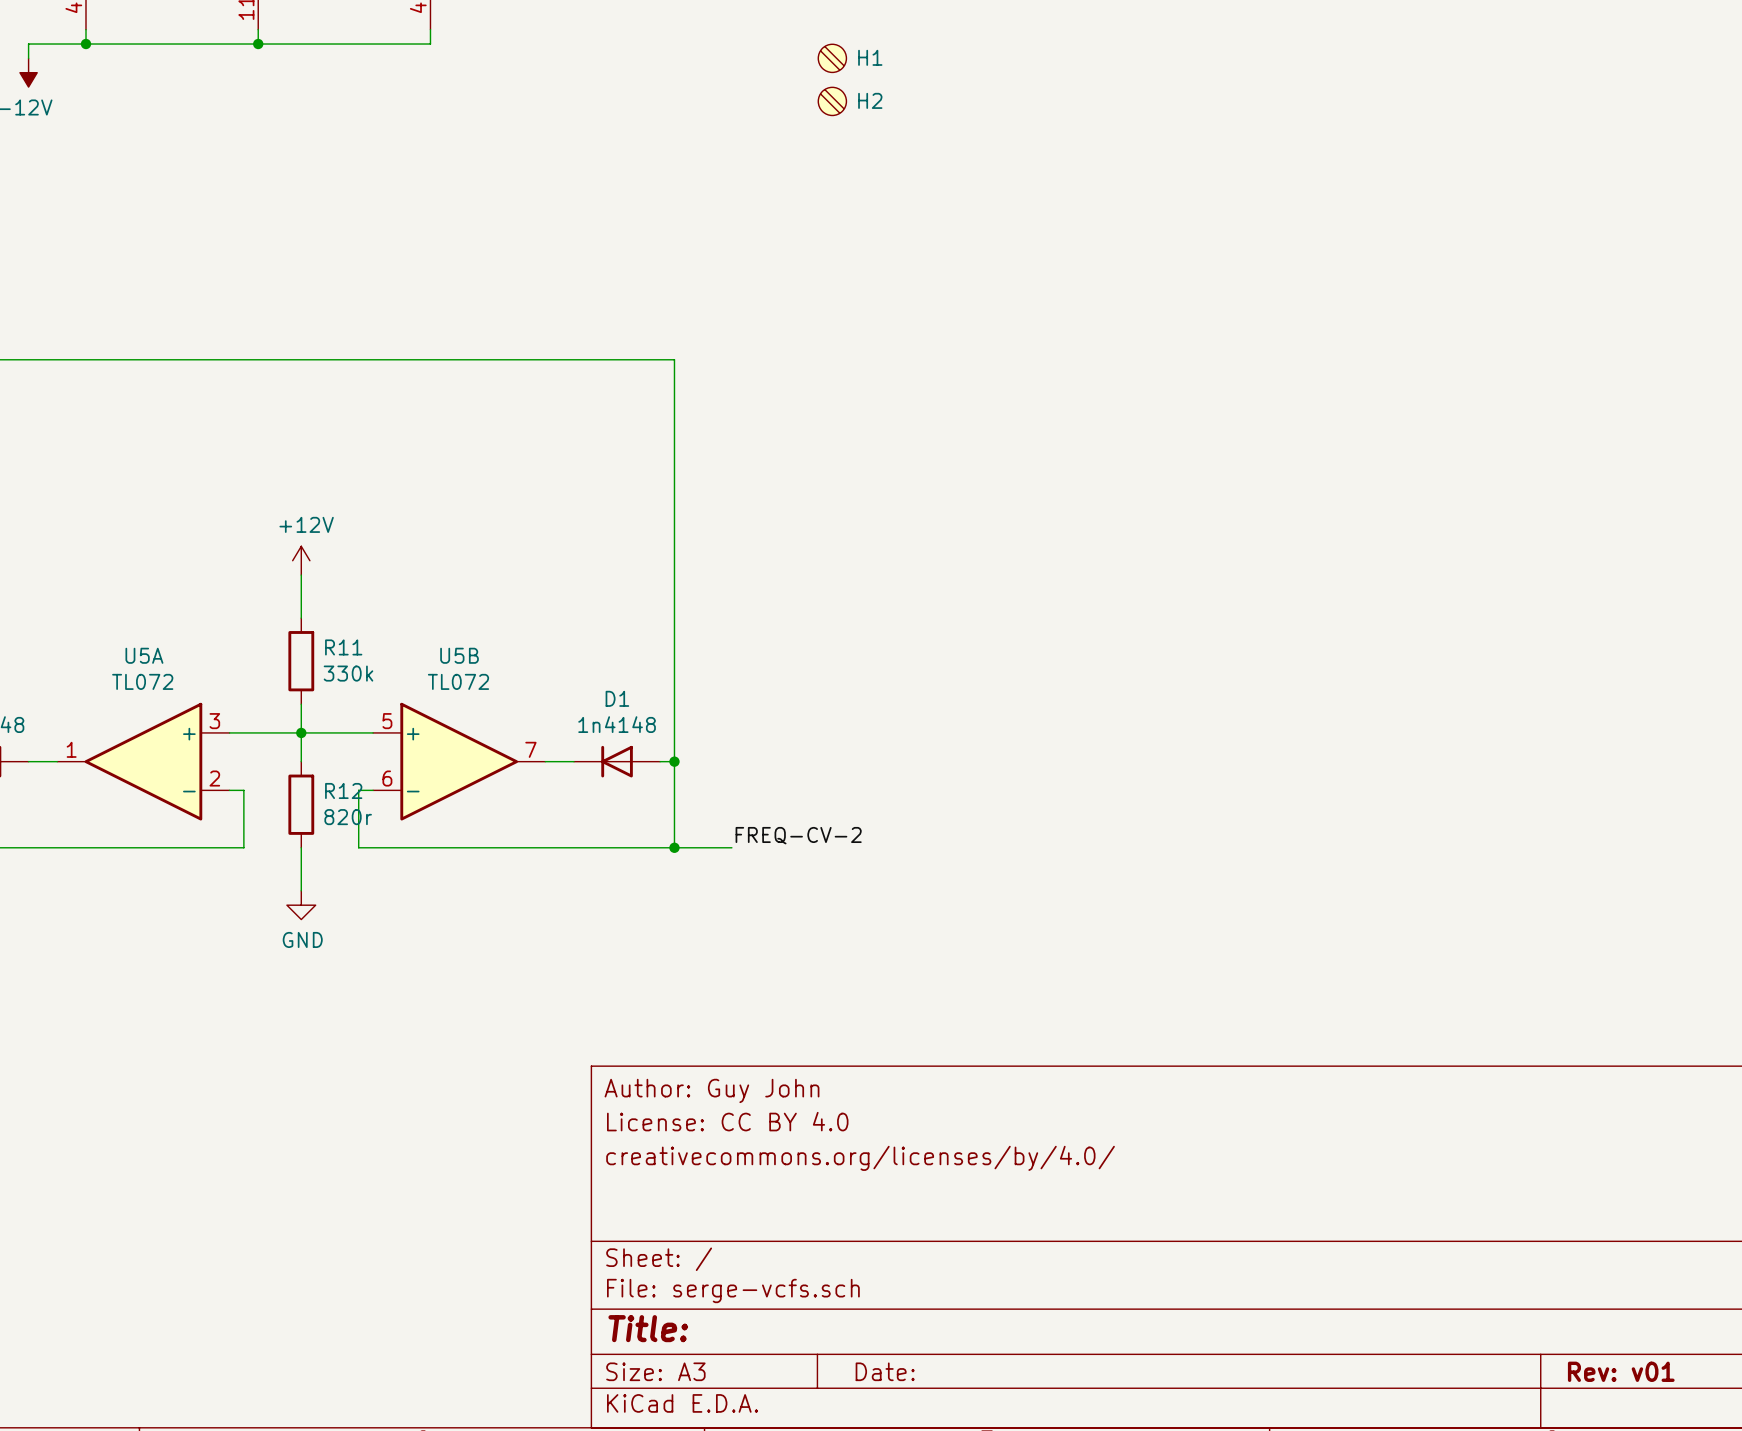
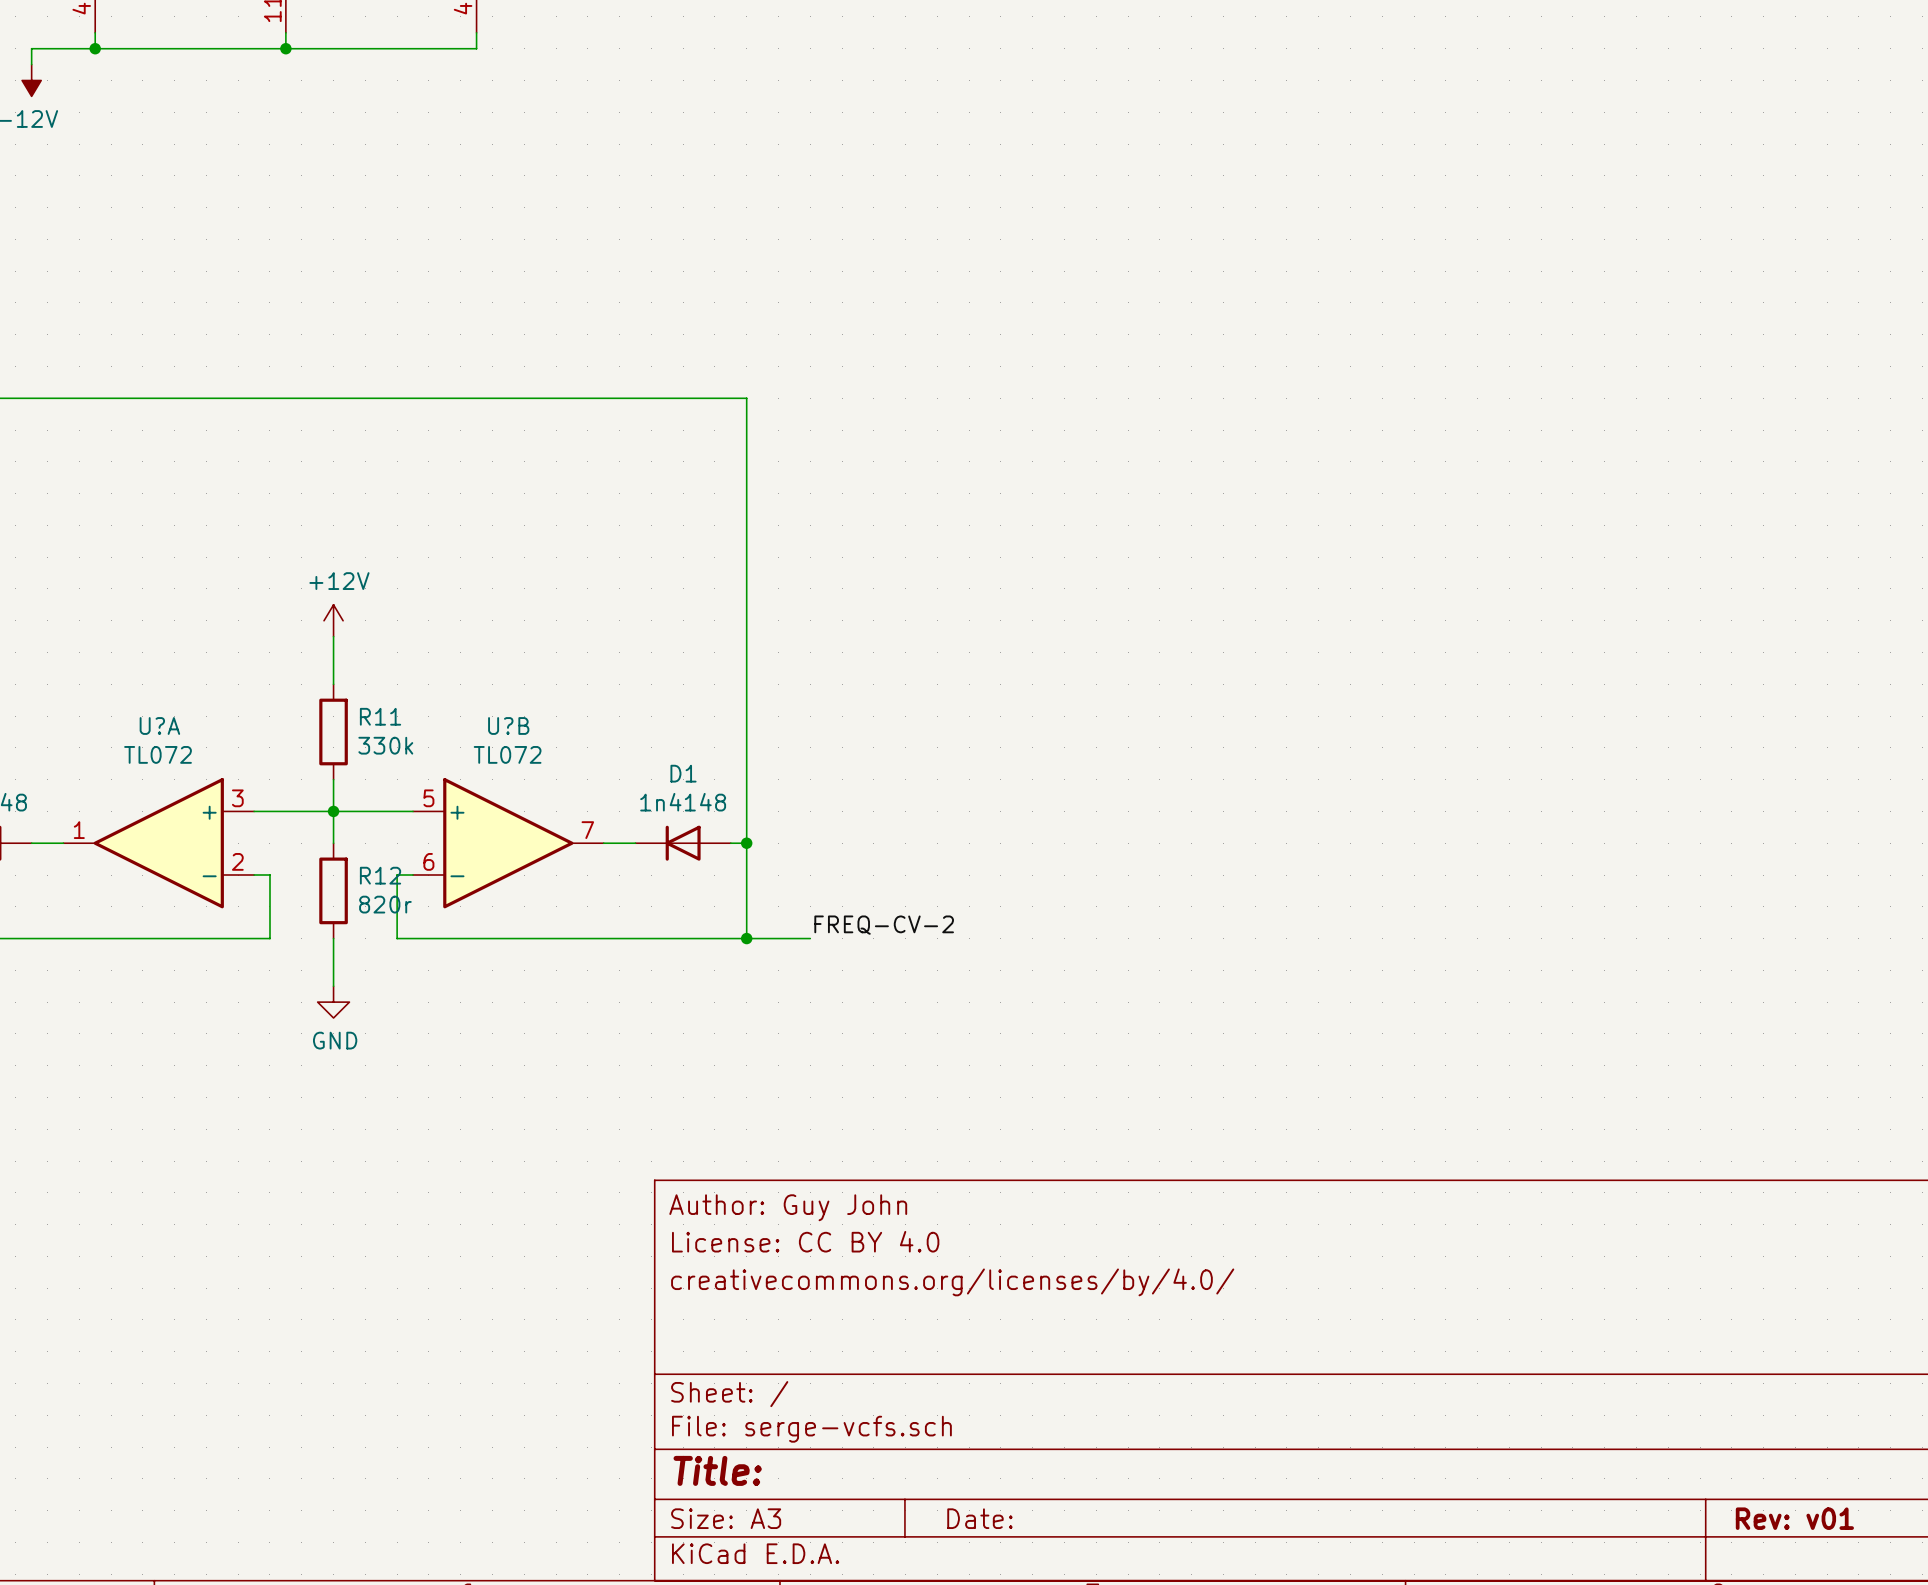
H1: (832, 58) -> none
H2: (832, 101) -> none
U5A name: U5A (144, 655) -> U?A (159, 725)
U5B name: U5B (459, 655) -> U?B (508, 725)

